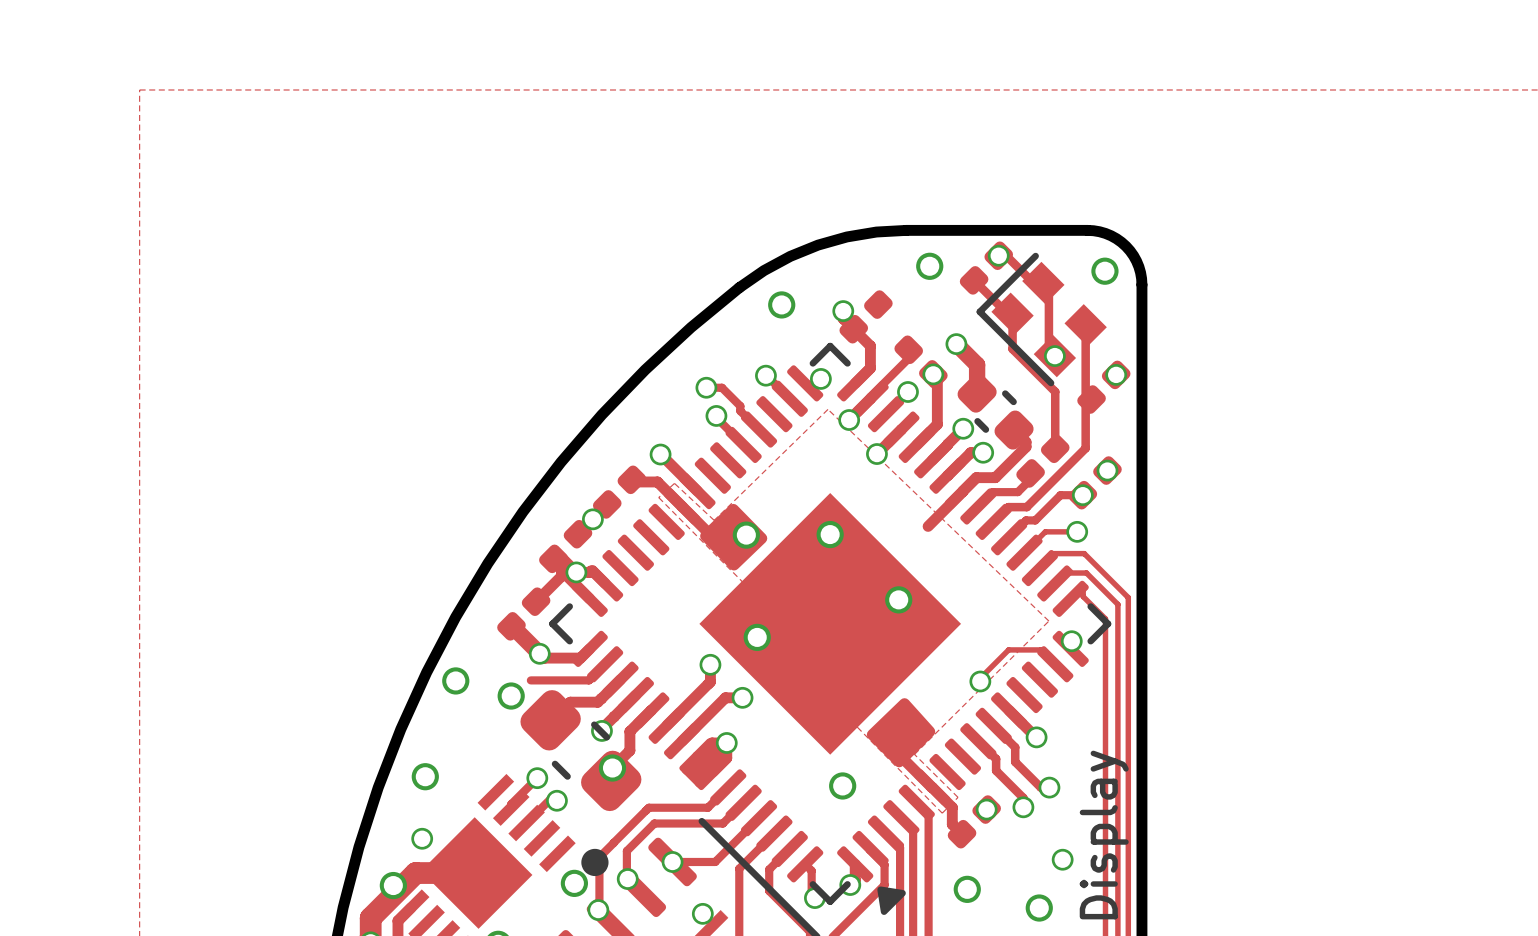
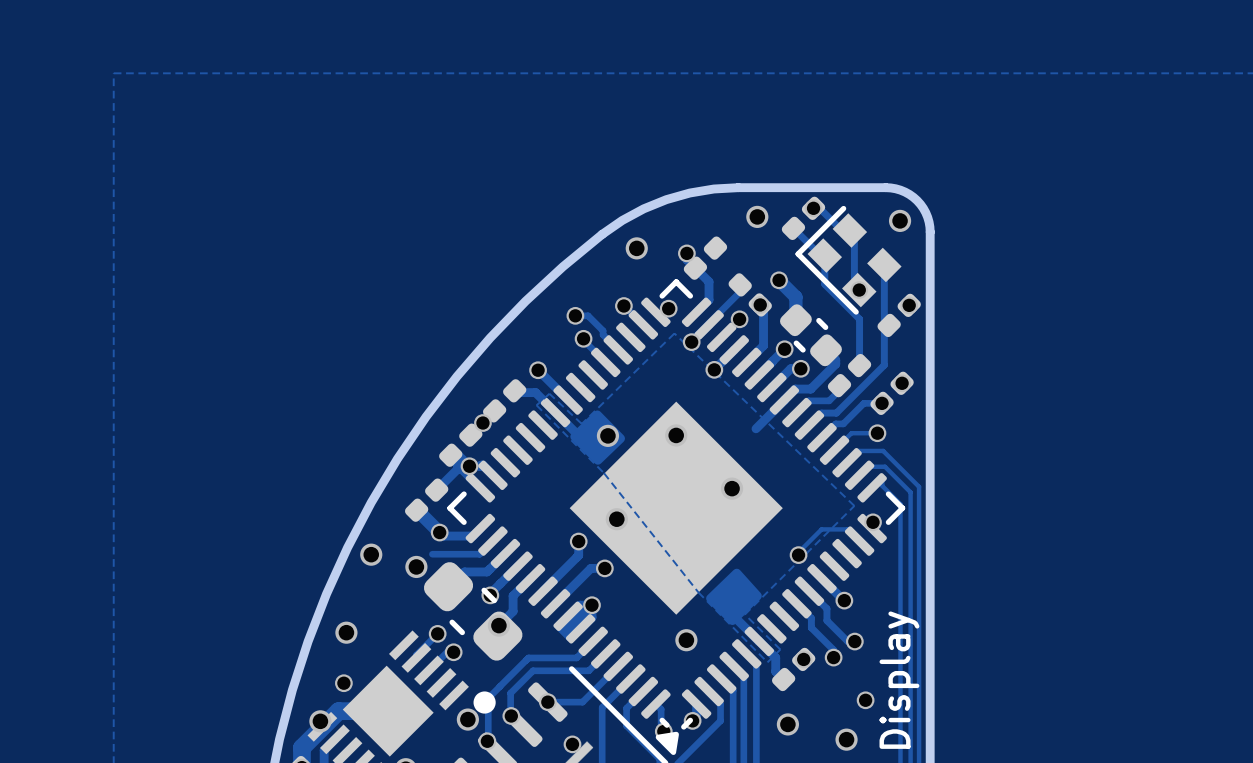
part footprint: [549, 342, 1112, 915] -> [447, 279, 906, 755]

